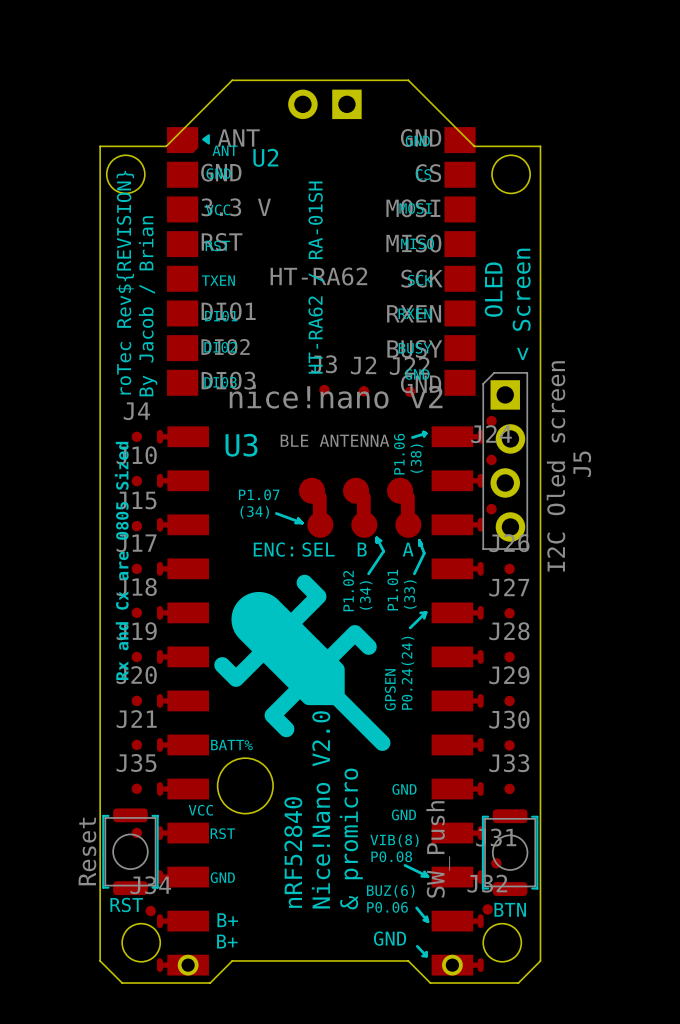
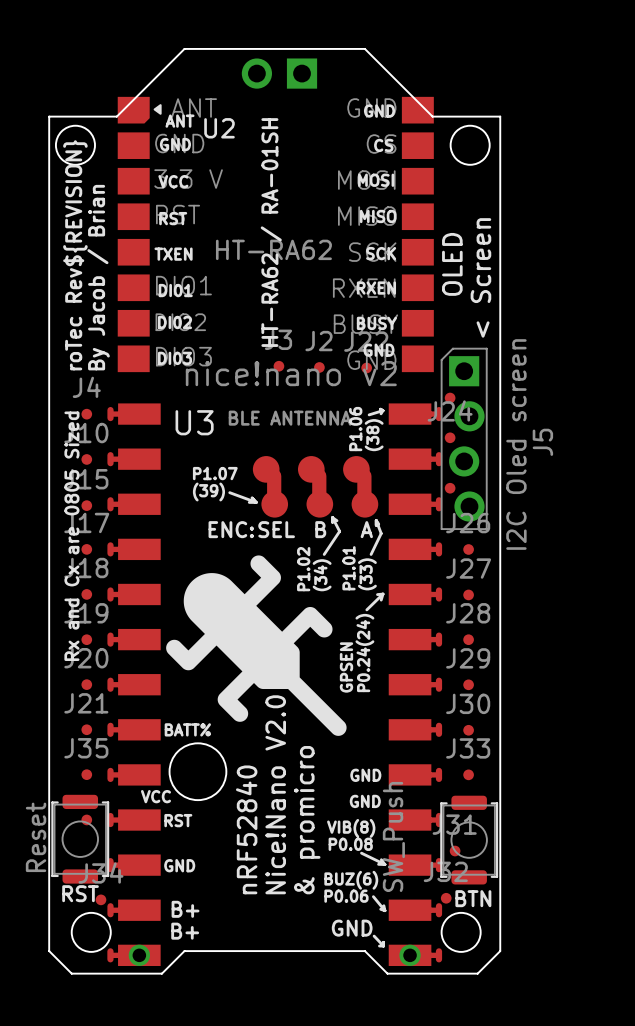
text: (34) (254, 512) -> (39) (208, 491)

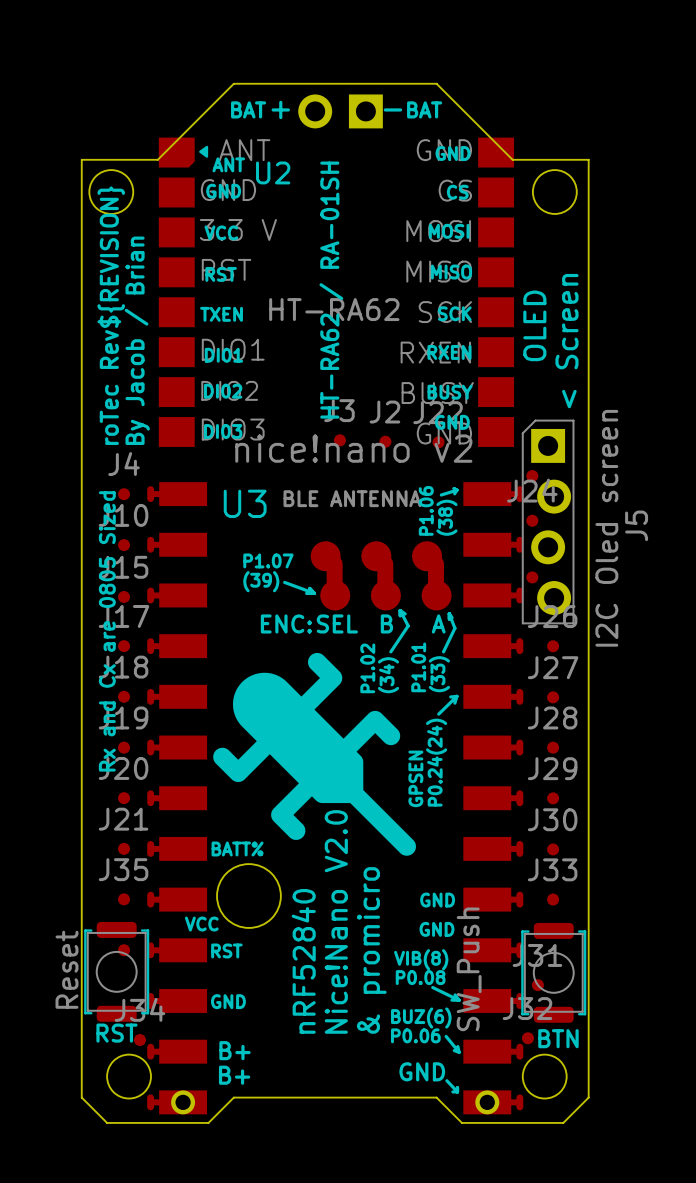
text: none -> BAT (248, 109)
text: none -> + (280, 109)
text: none -> - (392, 109)
text: none -> BAT (424, 109)

